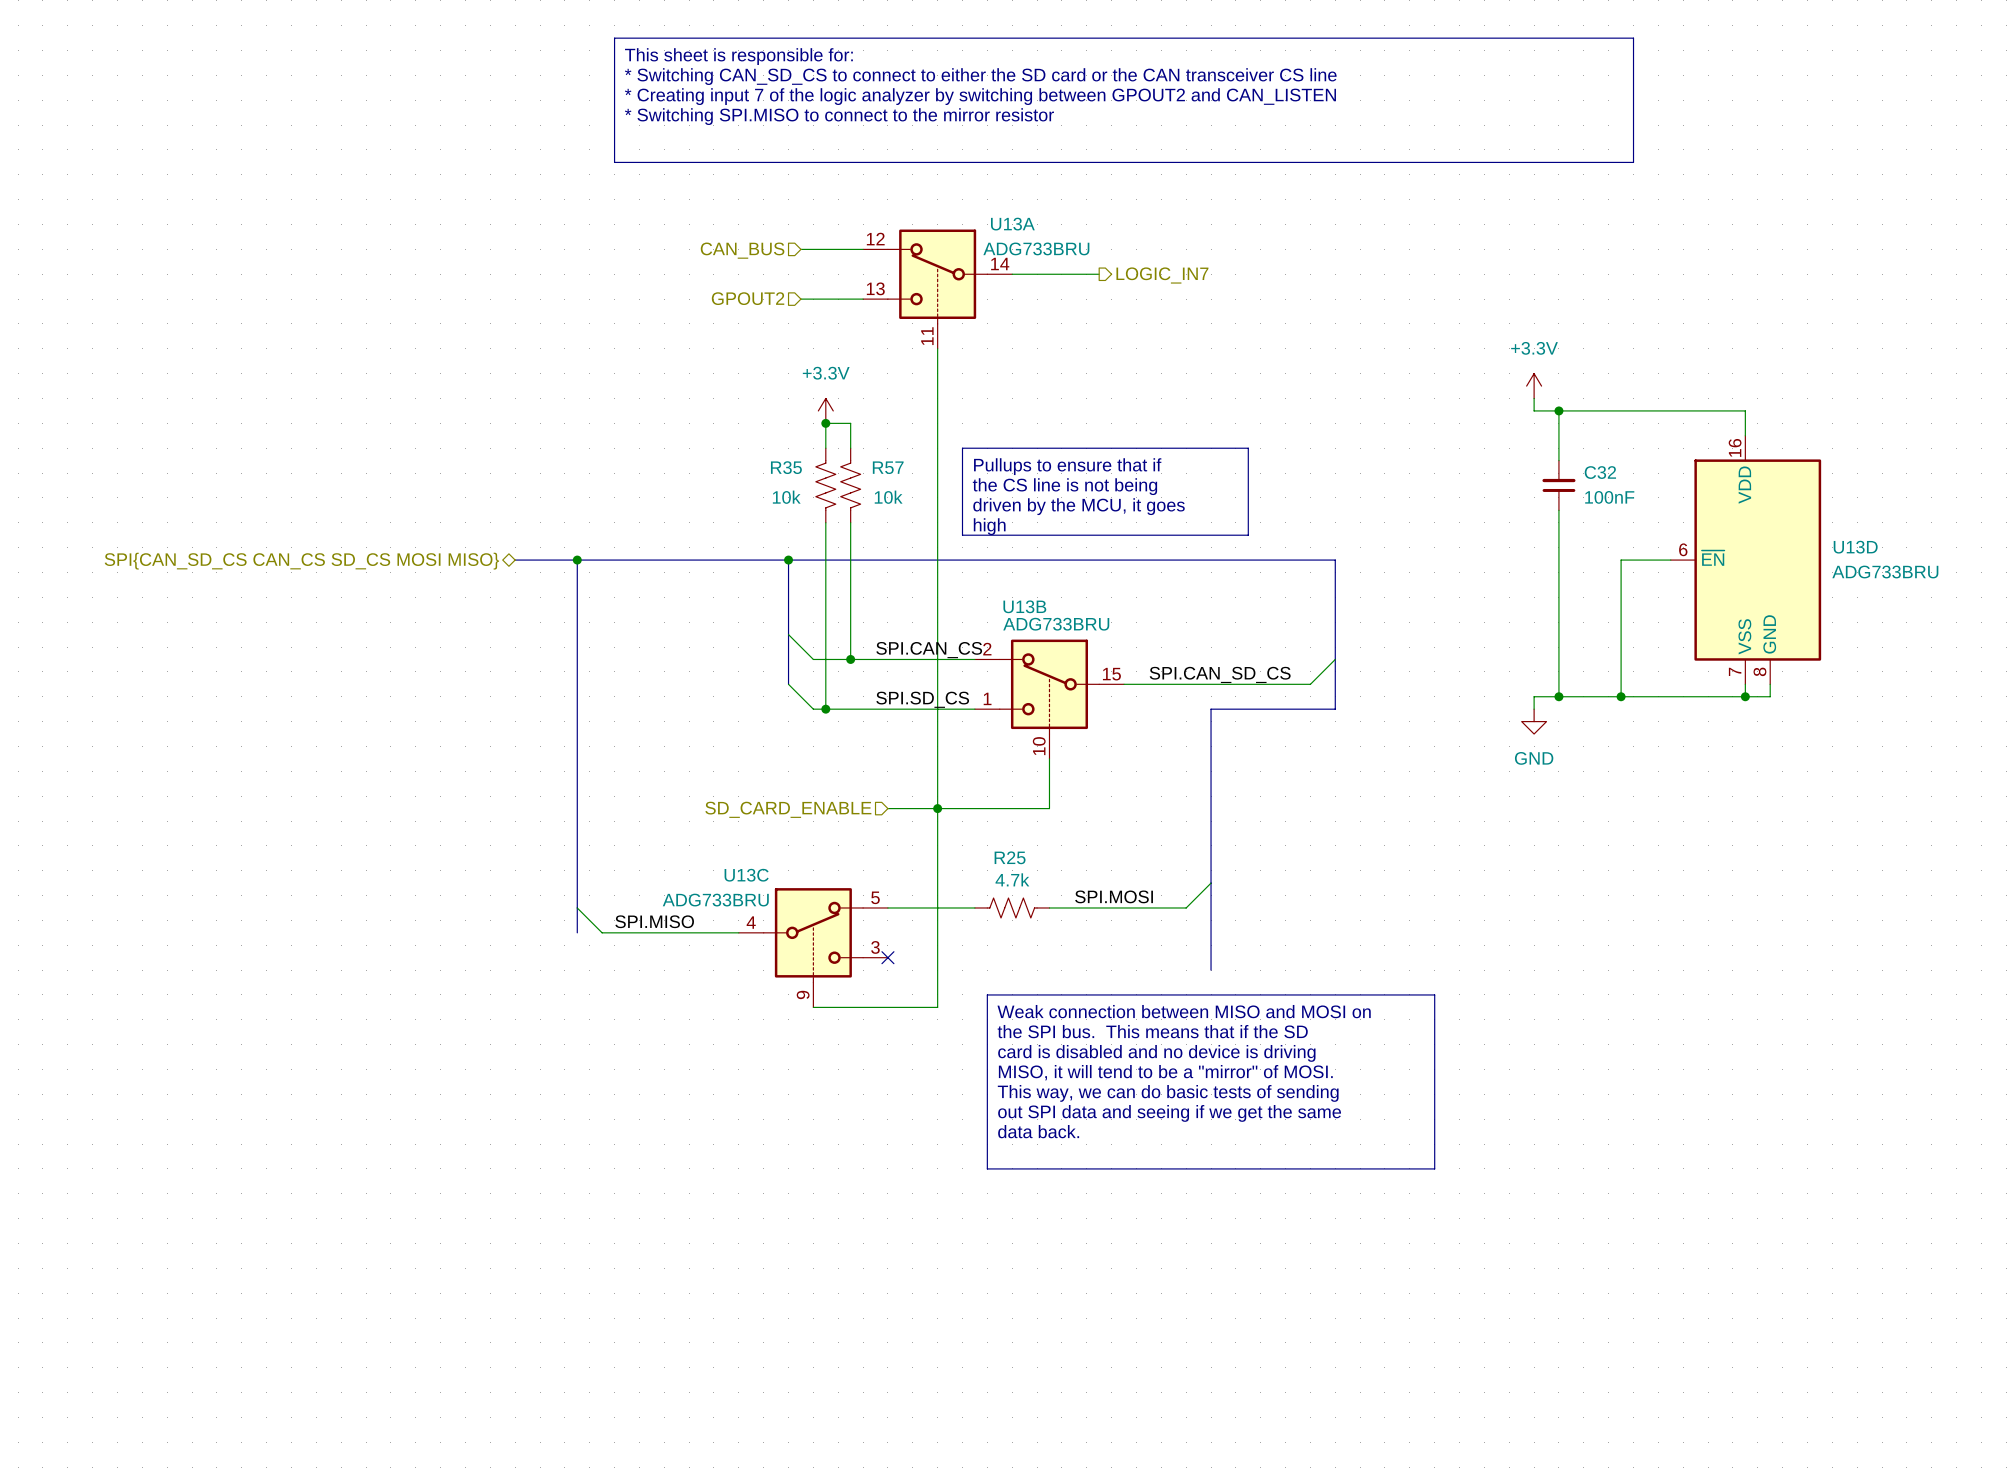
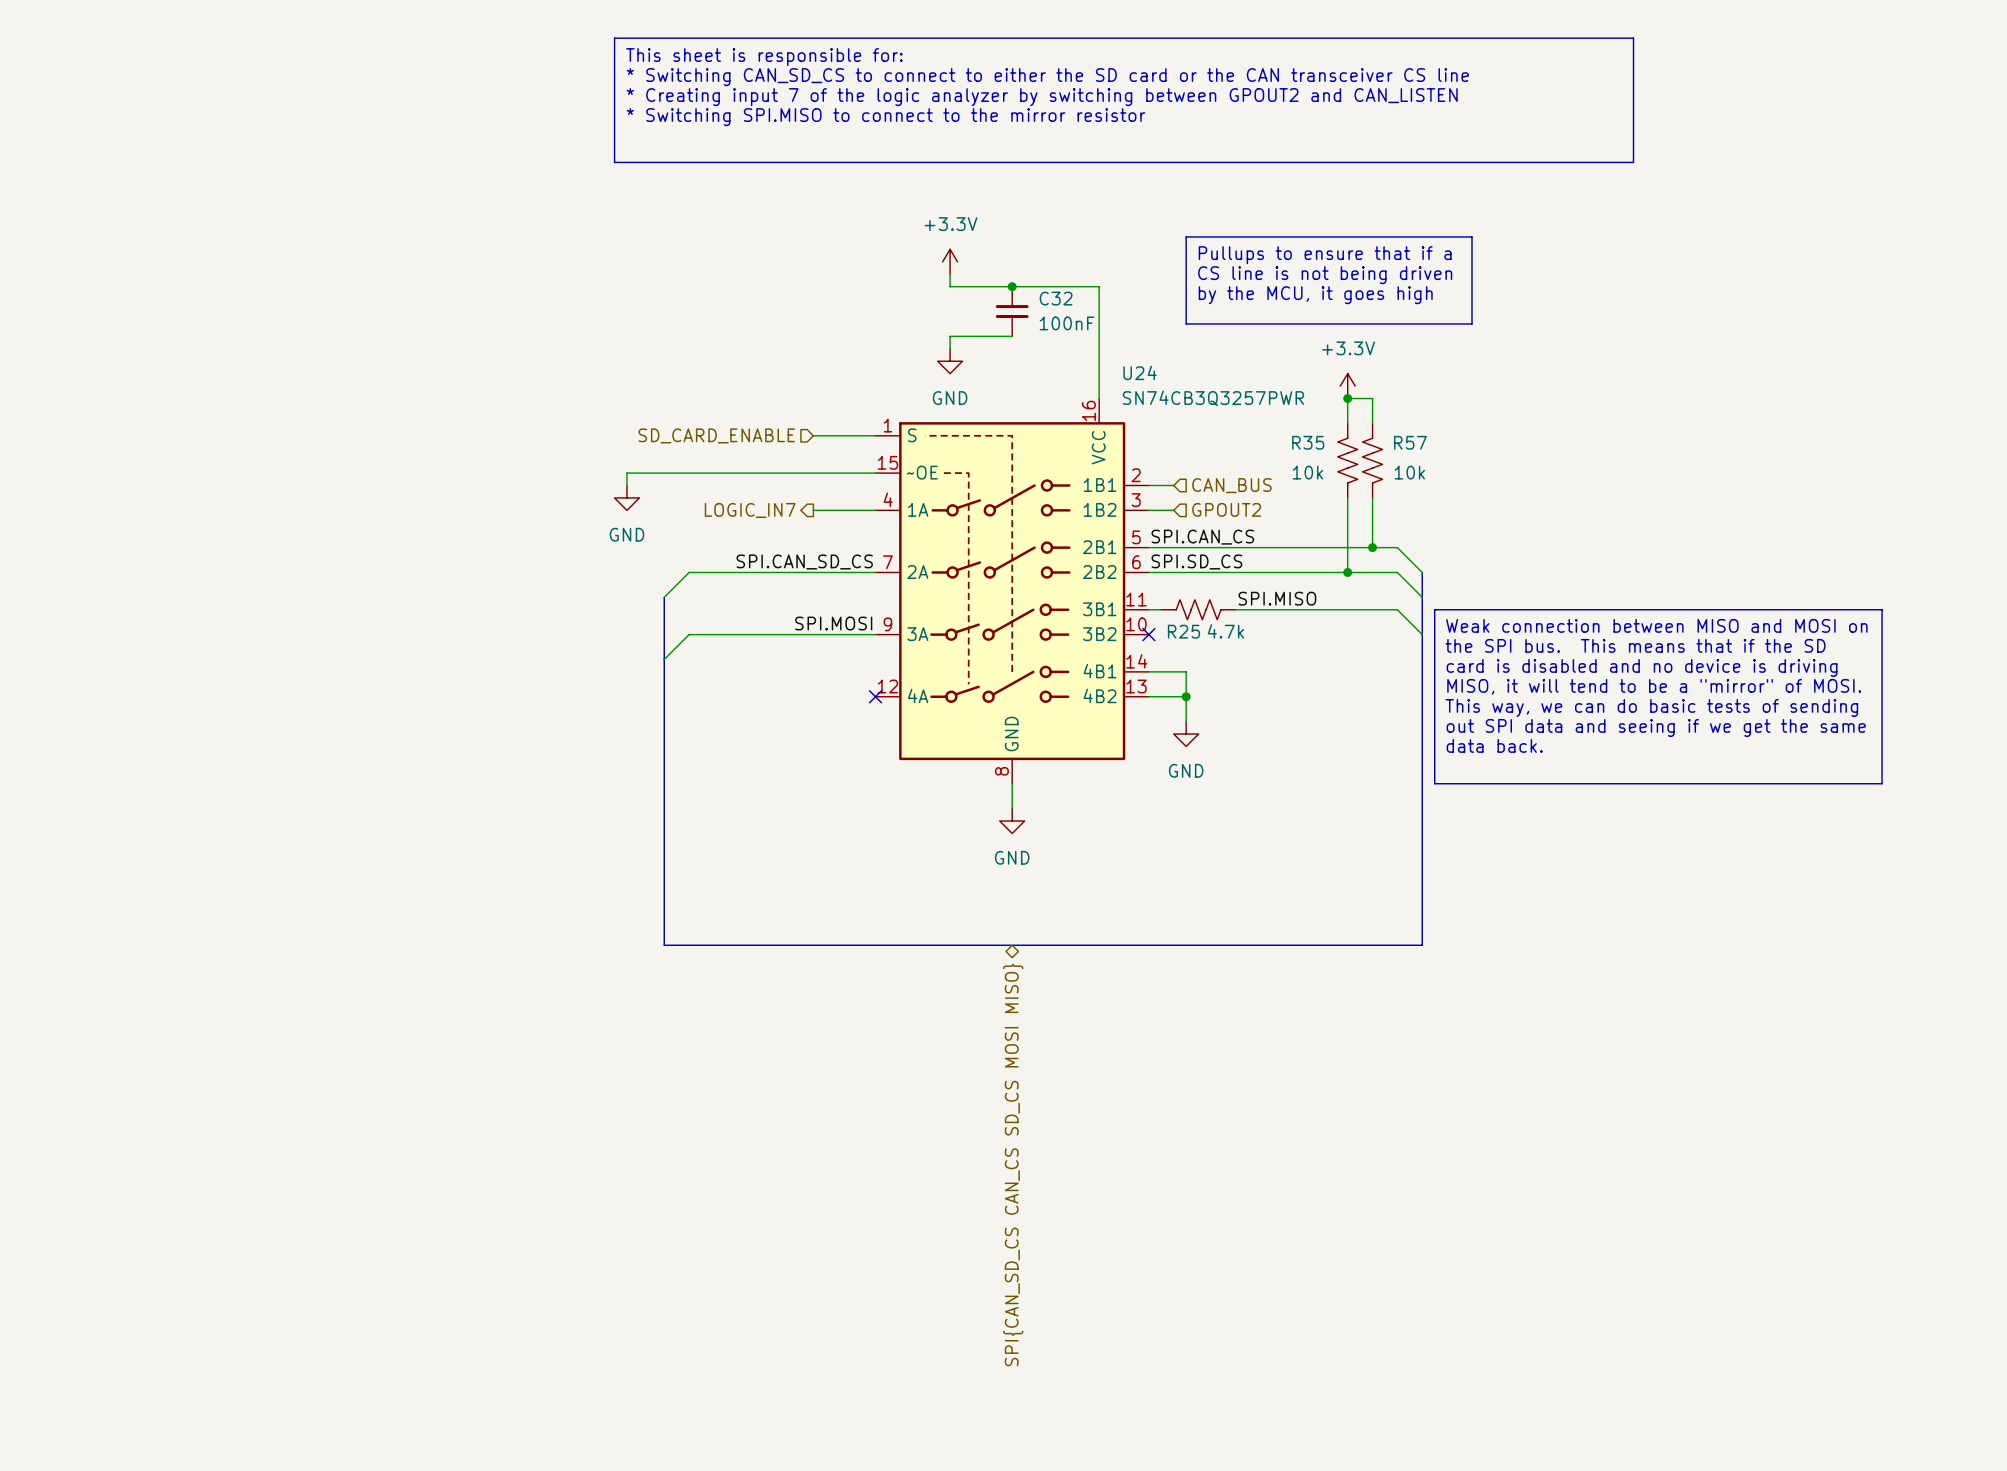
line: none -> (1186, 236) (1471, 236) (1471, 323) (1186, 323) (1186, 236)
wire: (800, 249) (863, 249) -> none
hierarchical label: CAN_BUS (742, 250) -> none
text: none -> Pullups to ensure that if a (1325, 255)
wire: none -> (950, 274) (950, 286) (1099, 286) (1099, 398)
wire: (1012, 274) (1099, 274) -> none
text: none -> CS line is not being driven (1325, 275)
hierarchical label: LOGIC_IN7 (1162, 275) -> none
junction: none -> (1012, 286)
U13A: ADG733BRU (937, 289) -> none
text: none -> by the MCU, it goes high (1315, 295)
hierarchical label: GPOUT2 (748, 298) -> none
wire: (800, 299) (863, 299) -> (813, 435) (875, 435)
wire: none -> (1012, 336) (950, 336) (950, 348)
wire: (937, 348) (937, 1007) (813, 1007) -> none
power symbol: none -> GND (950, 361)
power symbol position: +3.3V (1534, 386) -> +3.3V (1347, 386)
junction: none -> (1347, 398)
wire: (1534, 398) (1534, 410) (1745, 410) (1745, 435) -> none
power symbol position: +3.3V (825, 410) -> +3.3V (950, 261)
wire: (1558, 410) (1558, 460) -> (1372, 497) (1372, 547)
junction: (1558, 410) -> none
junction: (825, 423) -> none
wire: none -> (1347, 423) (1347, 398) (1372, 398) (1372, 423)
hierarchical label: none -> SD_CARD_ENABLE (716, 435)
wire: (825, 448) (825, 423) (850, 423) (850, 448) -> none
line: (962, 448) (1248, 448) (1248, 535) (962, 535) (962, 448) -> none
C32 symbol: [1542, 460, 1576, 511] -> [995, 286, 1029, 337]
text: Pullups to ensure that if (1067, 466) -> none
wire: none -> (875, 473) (626, 473) (626, 485)
R35 position: (825, 485) -> (1347, 460)
R57 position: (850, 485) -> (1372, 460)
wire: none -> (1148, 485) (1173, 485)
text: the CS line is not being (1064, 486) -> none
hierarchical label: none -> CAN_BUS (1231, 485)
power symbol: none -> GND (626, 497)
wire: none -> (1347, 497) (1347, 572)
text: driven by the MCU, it goes (1079, 506) -> none
hierarchical label: none -> GPOUT2 (1226, 509)
wire: none -> (813, 510) (875, 510)
wire: none -> (1148, 510) (1173, 510)
wire: (1558, 510) (1558, 696) -> none
hierarchical label: none -> LOGIC_IN7 (750, 510)
wire: (825, 522) (825, 709) -> none
wire: (850, 522) (850, 659) -> none
text: high (989, 526) -> none
label: none -> SPI.CAN_CS (1202, 537)
wire: none -> (1148, 547) (1397, 547) (1422, 572)
junction: none -> (1372, 547)
bus: (515, 560) (1335, 560) (1335, 709) (1211, 709) (1211, 970) -> none
bus: (577, 560) (577, 932) -> none
junction: (577, 560) -> none
bus: (788, 560) (788, 684) -> none
junction: (788, 560) -> none
wire: (1670, 560) (1621, 560) (1621, 696) -> none
U13D: ADG733BRU (1745, 560) -> none
hierarchical label: SPI{CAN_SD_CS CAN_CS SD_CS MOSI MISO} (301, 561) -> none
label: none -> SPI.CAN_SD_CS (804, 561)
label: none -> SPI.SD_CS (1196, 561)
wire: none -> (875, 572) (689, 572) (664, 597)
wire: none -> (1148, 572) (1397, 572) (1422, 597)
junction: none -> (1347, 572)
bus: none -> (1422, 572) (1422, 945) (664, 945) (664, 597)
U24: none -> SN74CB3Q3257PWR (1012, 591)
label: none -> SPI.MISO (1277, 598)
wire: none -> (1148, 609) (1161, 609)
wire: none -> (1235, 609) (1397, 609) (1422, 634)
line: none -> (1434, 609) (1882, 609) (1882, 783) (1434, 783) (1434, 609)
label: none -> SPI.MOSI (833, 623)
text: none -> Weak connection between MISO and MOSI on (1656, 625)
wire: (788, 634) (813, 659) (974, 659) -> none
wire: none -> (875, 634) (689, 634) (664, 659)
no-connect mark: none -> (1148, 634)
text: none -> the SPI bus. This means that if the SD (1635, 645)
label: SPI.CAN_CS (929, 650) -> none
junction: (850, 659) -> none
wire: (1335, 659) (1310, 684) (1124, 684) -> none
text: none -> card is disabled and no device is driving (1642, 667)
wire: none -> (1148, 671) (1186, 671) (1186, 721)
label: SPI.CAN_SD_CS (1220, 674) -> none
wire: (788, 684) (813, 709) (974, 709) -> none
wire: (1745, 684) (1745, 696) -> none
wire: (1770, 684) (1770, 696) (1534, 696) (1534, 709) -> none
text: none -> MISO, it will tend to be a "mirror" of MOSI. (1654, 686)
no-connect mark: none -> (875, 696)
wire: none -> (1148, 696) (1186, 696)
junction: none -> (1186, 696)
junction: (1558, 696) -> none
junction: (1621, 696) -> none
junction: (1745, 696) -> none
label: SPI.SD_CS (922, 699) -> none
U13B: ADG733BRU (1049, 699) -> none
text: none -> This way, we can do basic tests of sending (1651, 707)
junction: (825, 709) -> none
power symbol: GND (1534, 721) -> none
text: none -> out SPI data and seeing if we get the same (1656, 727)
power symbol: none -> GND (1186, 734)
text: none -> data back. (1494, 745)
wire: (1049, 758) (1049, 808) (887, 808) -> none
wire: none -> (1012, 783) (1012, 808)
junction: (937, 808) -> none
hierarchical label: SD_CARD_ENABLE (788, 809) -> none
power symbol: none -> GND (1012, 821)
R25 name position: R25 (1010, 857) -> R25 (1183, 631)
R25 value position: 4.7k (1012, 879) -> 4.7k (1225, 631)
wire: (1211, 883) (1186, 907) (1049, 907) -> none
label: SPI.MOSI (1114, 896) -> none
wire: (577, 907) (602, 932) (738, 932) -> none
wire: (887, 907) (974, 907) -> none
R25 position: (1012, 907) -> (1198, 609)
label: SPI.MISO (654, 921) -> none
U13C: ADG733BRU (813, 947) -> none
no-connect mark: (887, 957) -> none
line: (987, 994) (1434, 994) (1434, 1168) (987, 1168) (987, 994) -> none
text: Weak connection between MISO and MOSI on (1184, 1011) -> none
text: the SPI bus. This means that if the SD (1152, 1031) -> none
text: card is disabled and no device is driving (1156, 1053) -> none
text: MISO, it will tend to be a "mirror" of MOSI. (1165, 1072) -> none
text: This way, we can do basic tests of sending (1168, 1093) -> none
text: out SPI data and seeing if we get the same (1169, 1113) -> none
text: data back. (1038, 1131) -> none
hierarchical label: none -> SPI{CAN_SD_CS CAN_CS SD_CS MOSI MISO} (1013, 1164)

